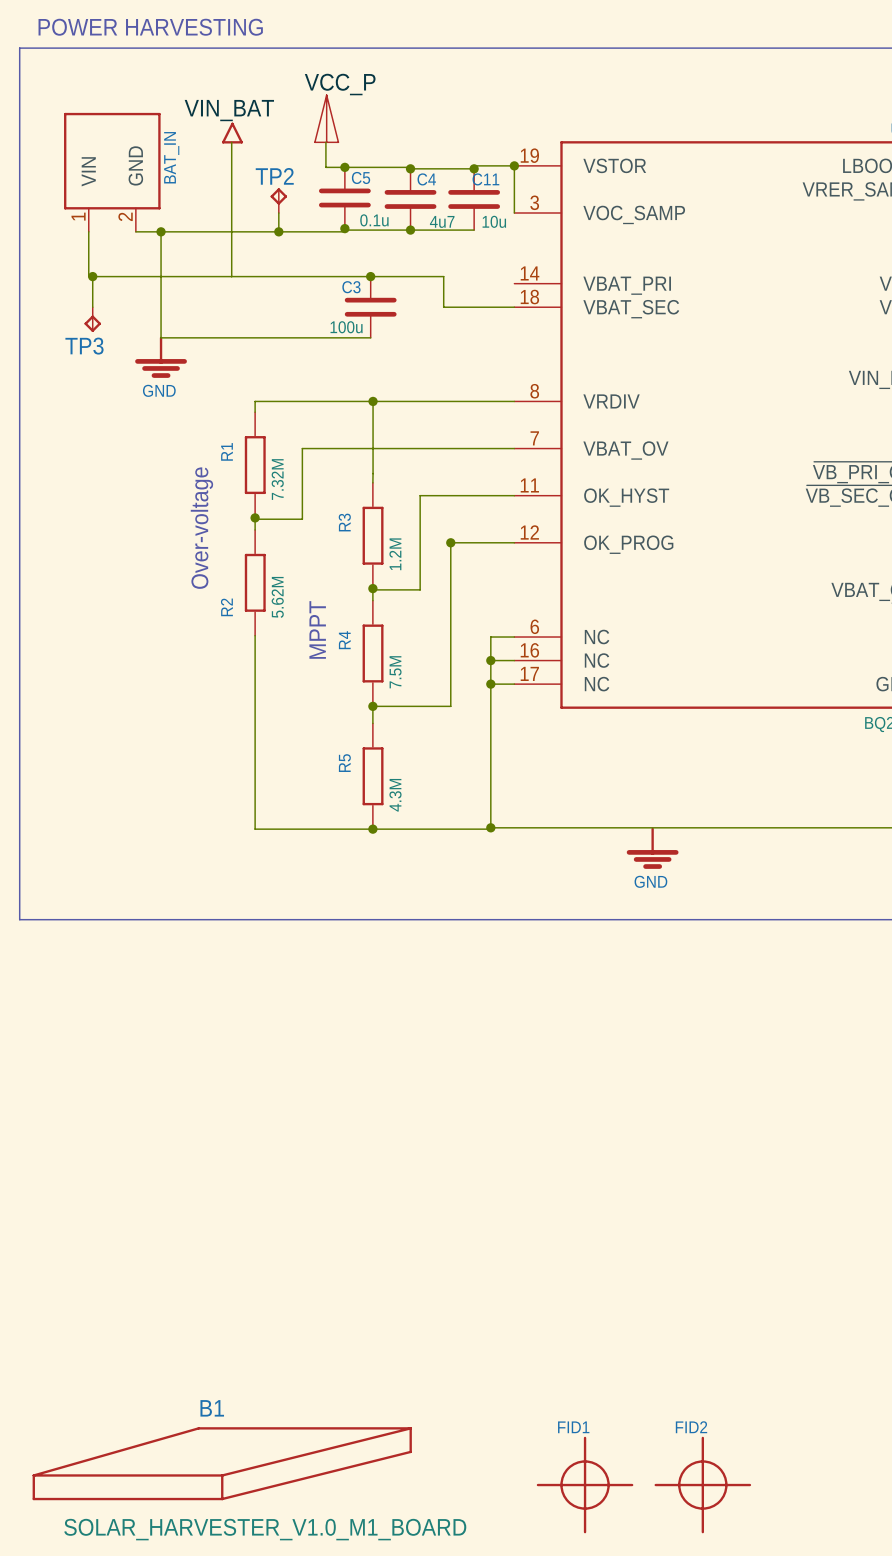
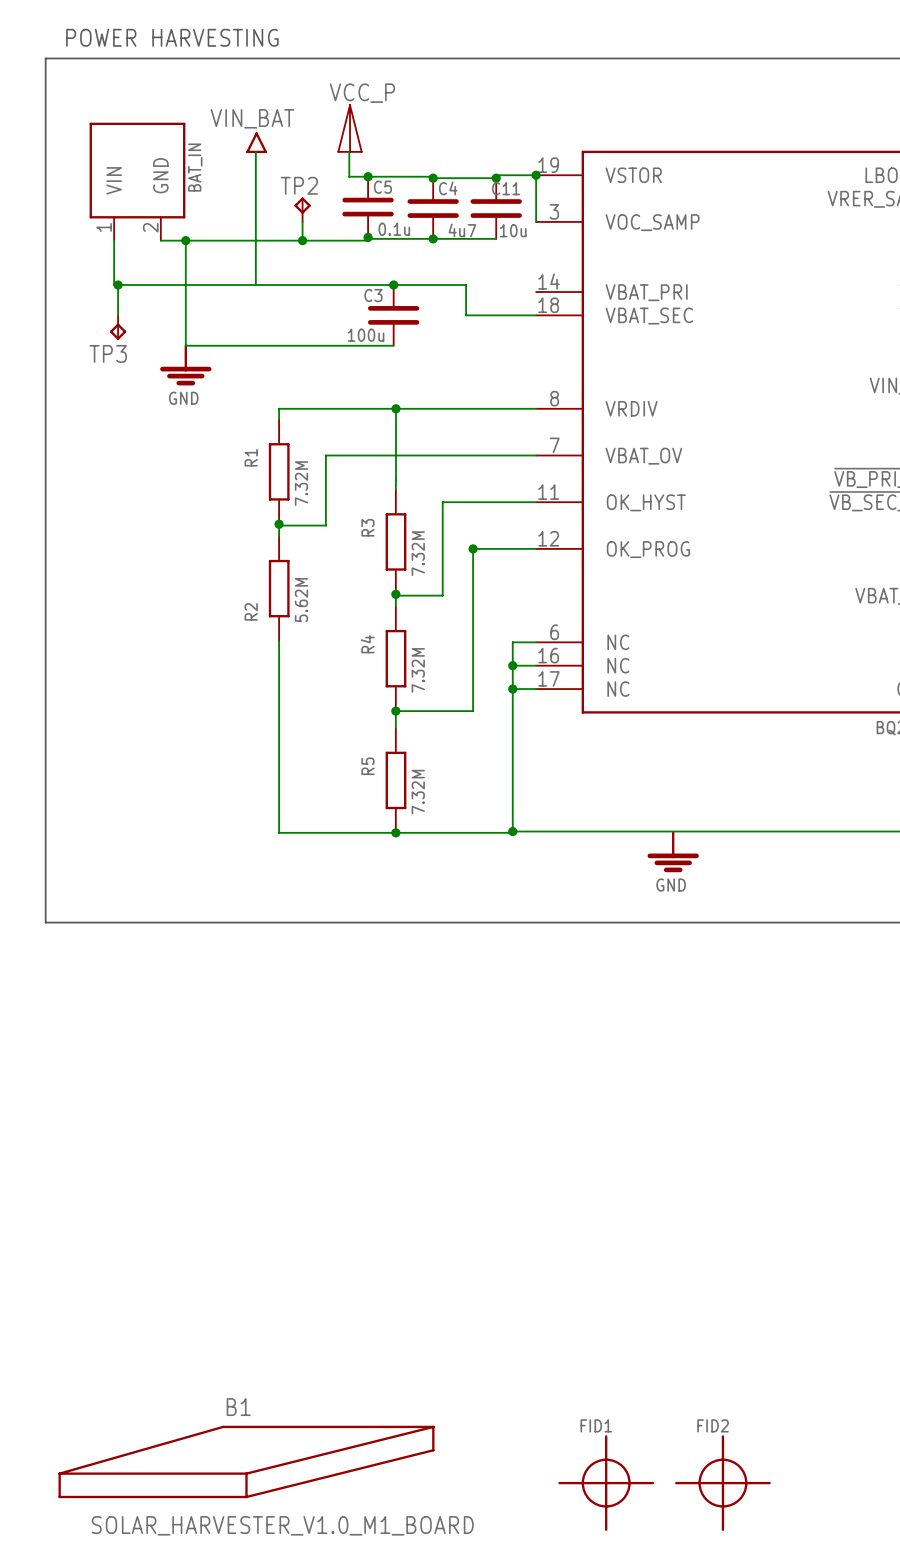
text: Over-voltage (201, 528) -> none
R3 value: 1.2M (395, 554) -> 7.32M (418, 553)
text: MPPT (317, 629) -> none
R4 value: 7.5M (395, 672) -> 7.32M (418, 670)
R5 value: 4.3M (395, 795) -> 7.32M (418, 792)

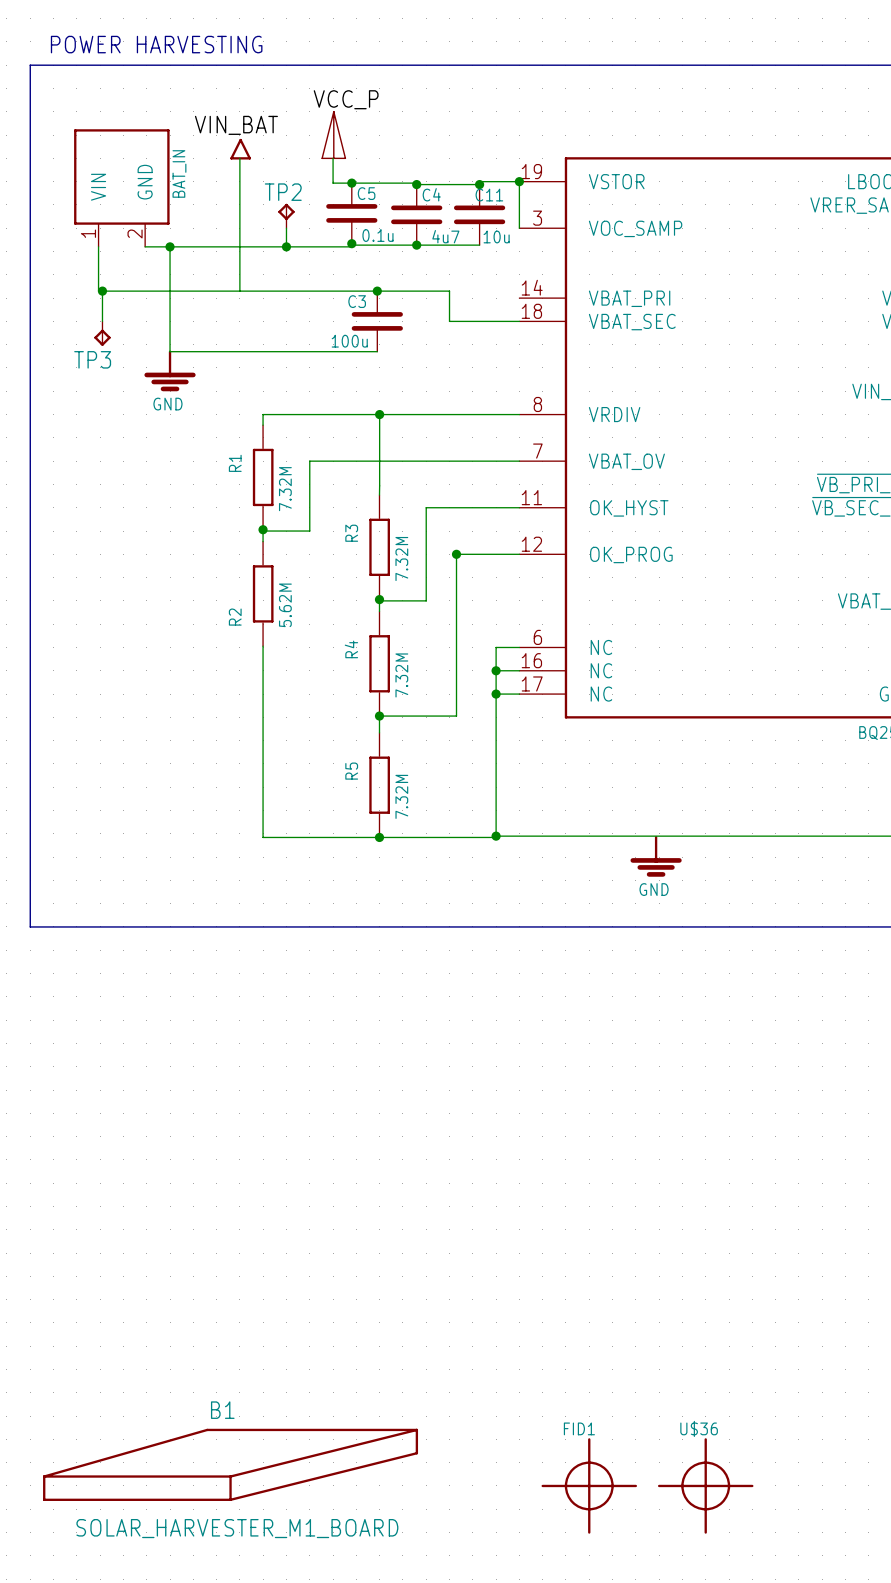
FID2 name: FID2 (713, 1425) -> U$36 (699, 1428)
B1 value: SOLAR_HARVESTER_V1.0_M1_BOARD (282, 1525) -> SOLAR_HARVESTER_M1_BOARD (237, 1528)

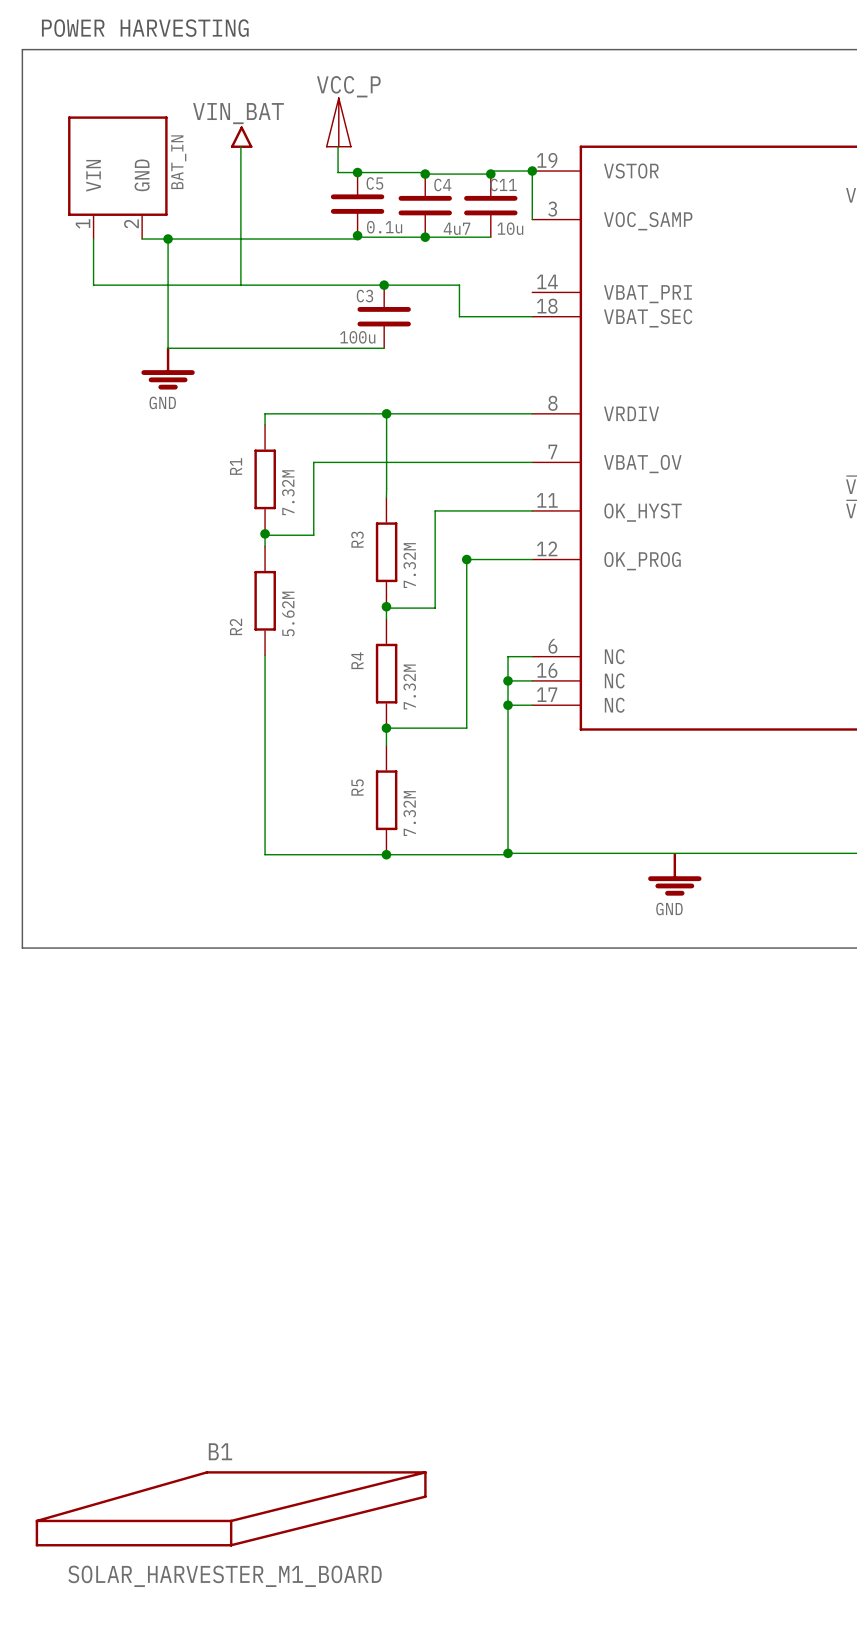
TP2: (286, 216) -> none
wire: (286, 228) (286, 246) -> none
junction: (286, 246) -> none
wire: (102, 291) (102, 321) -> none
junction: (102, 291) -> none
TP3: (102, 333) -> none
FID1: (589, 1485) -> none
U$36: (705, 1485) -> none

